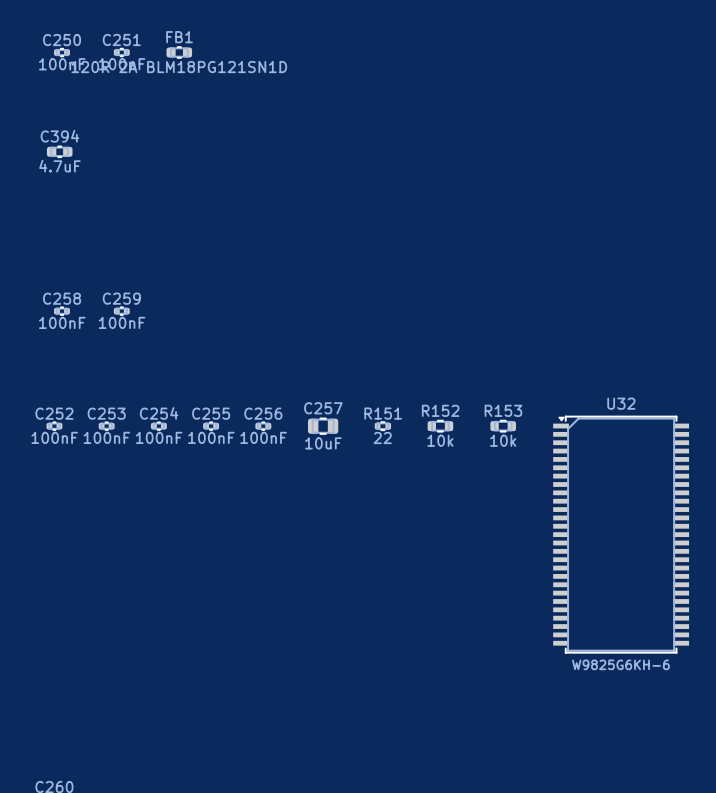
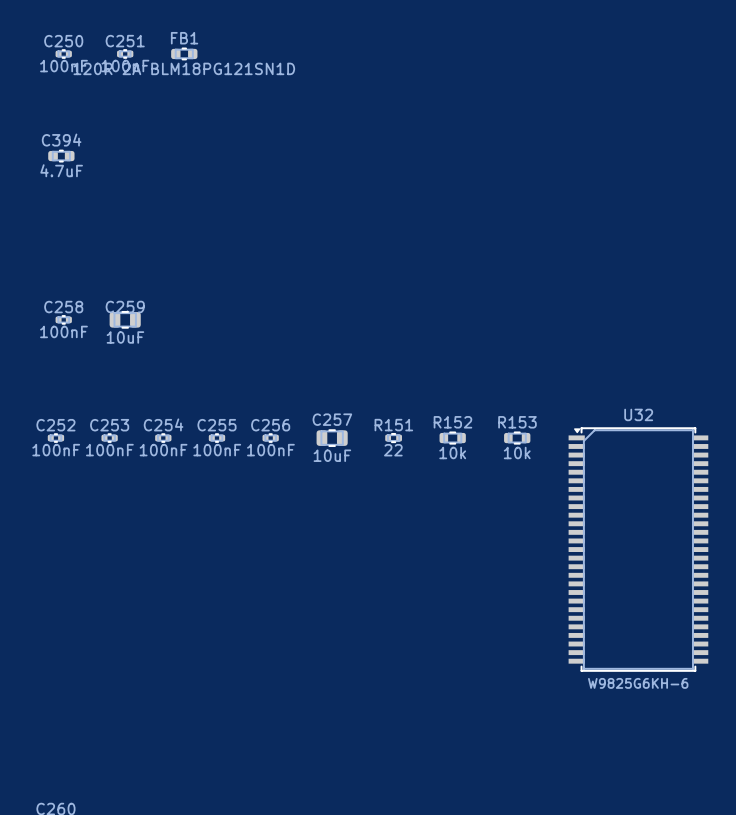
C259 footprint: [113, 306, 130, 316] -> [109, 311, 141, 329]
C259 value: 100nF (122, 322) -> 10uF (125, 337)

